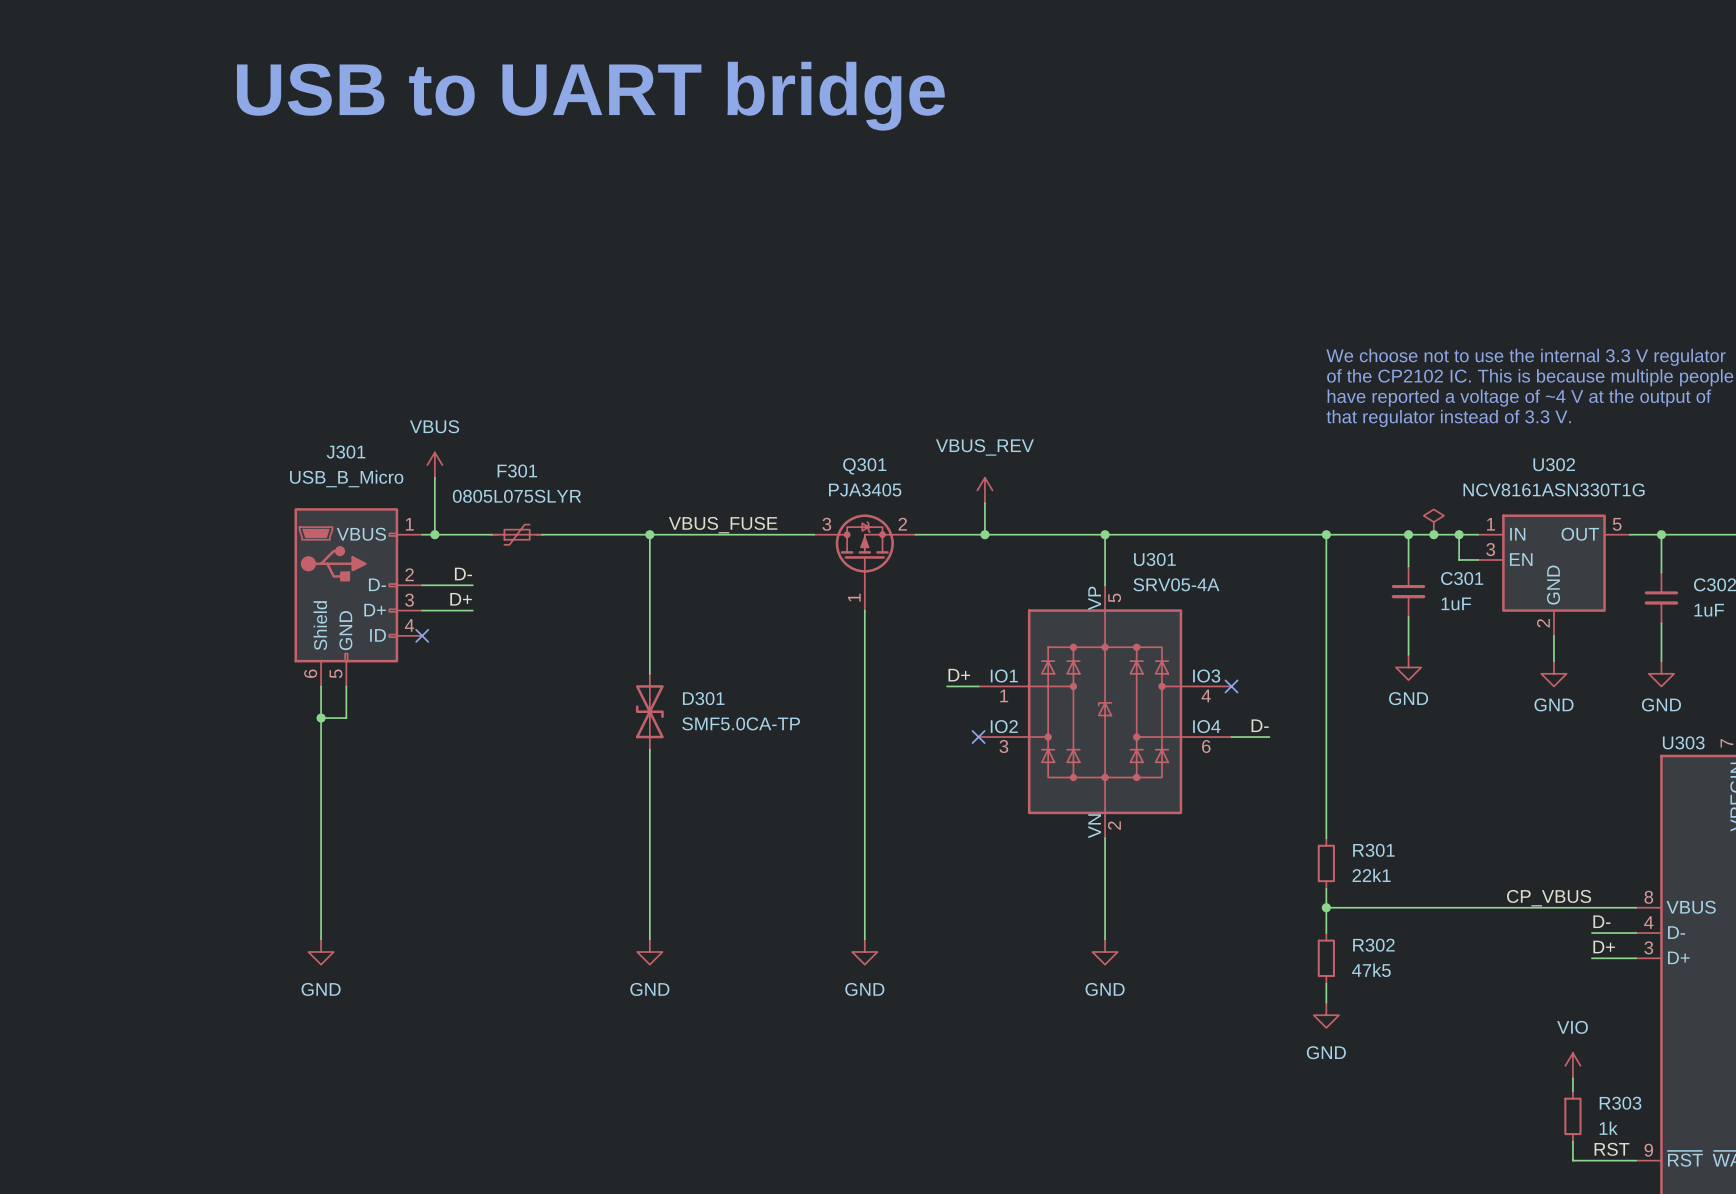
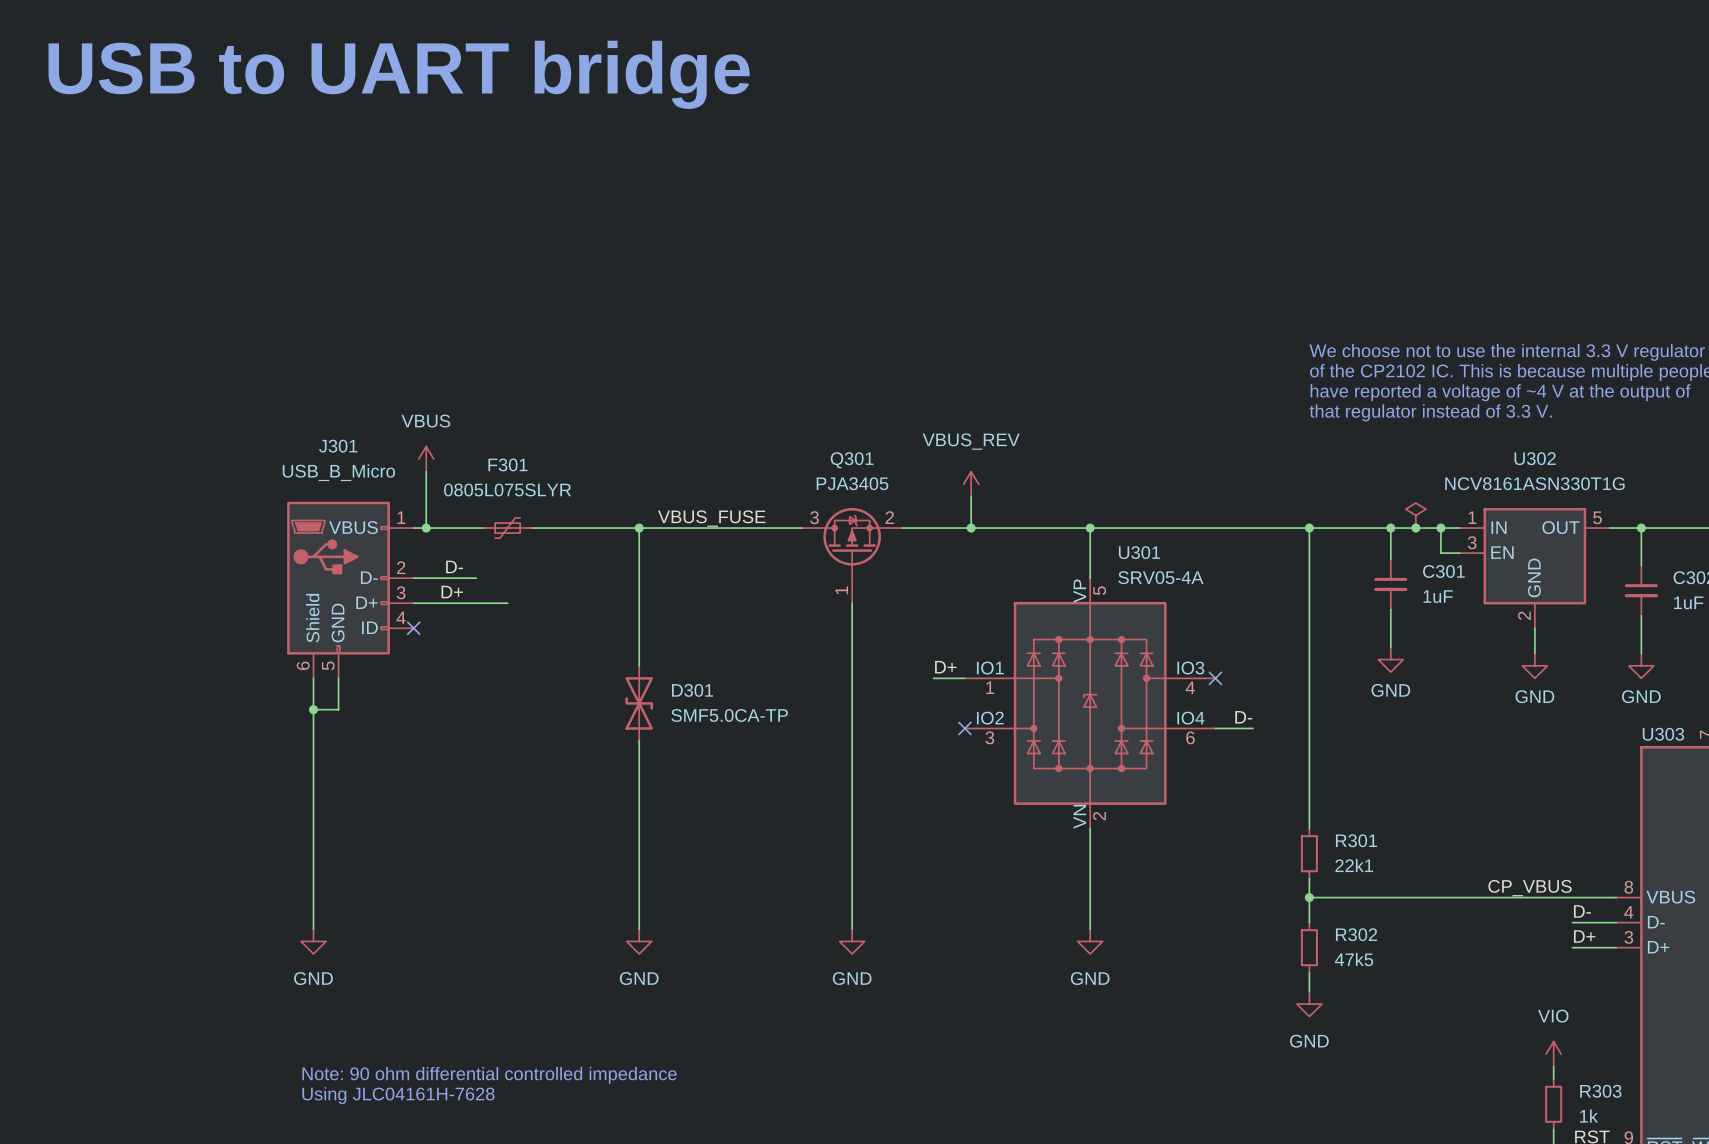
text position: USB to UART bridge (590, 96) -> USB to UART bridge (399, 74)
wire: none -> (463, 578) (476, 578)
wire: none -> (463, 603) (507, 603)
text: none -> Note: 90 ohm differential controlled impedance (489, 1075)
text: none -> Using JLC04161H-7628 (398, 1095)

